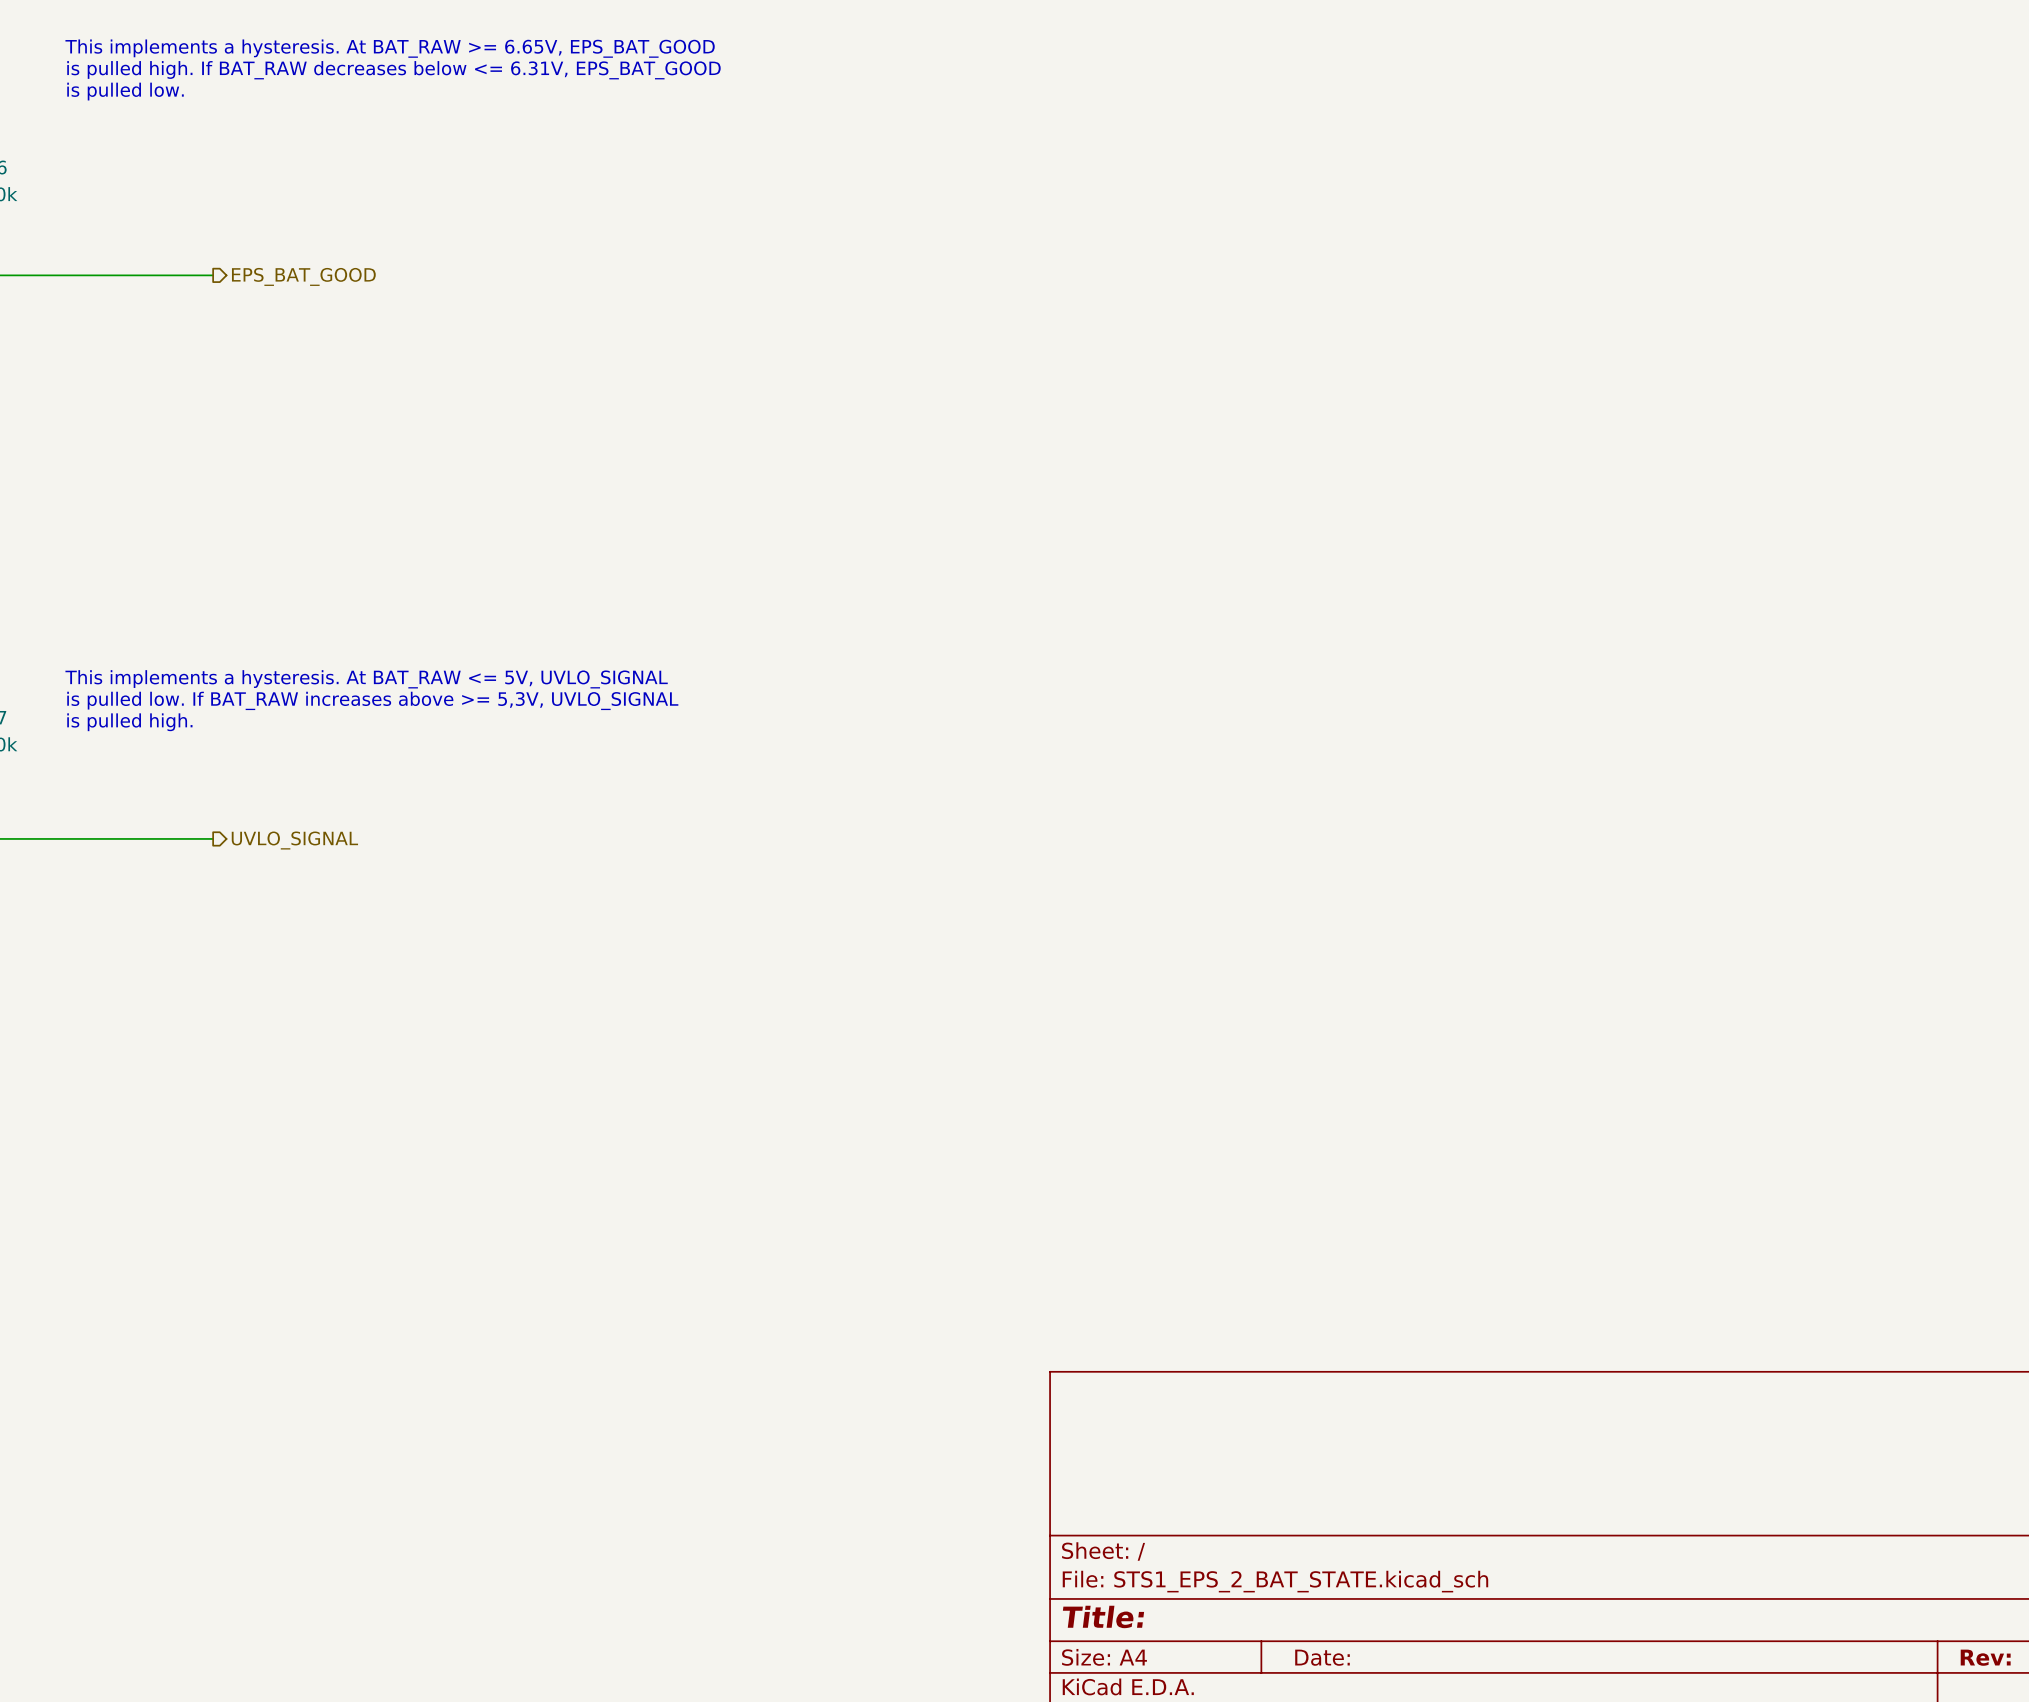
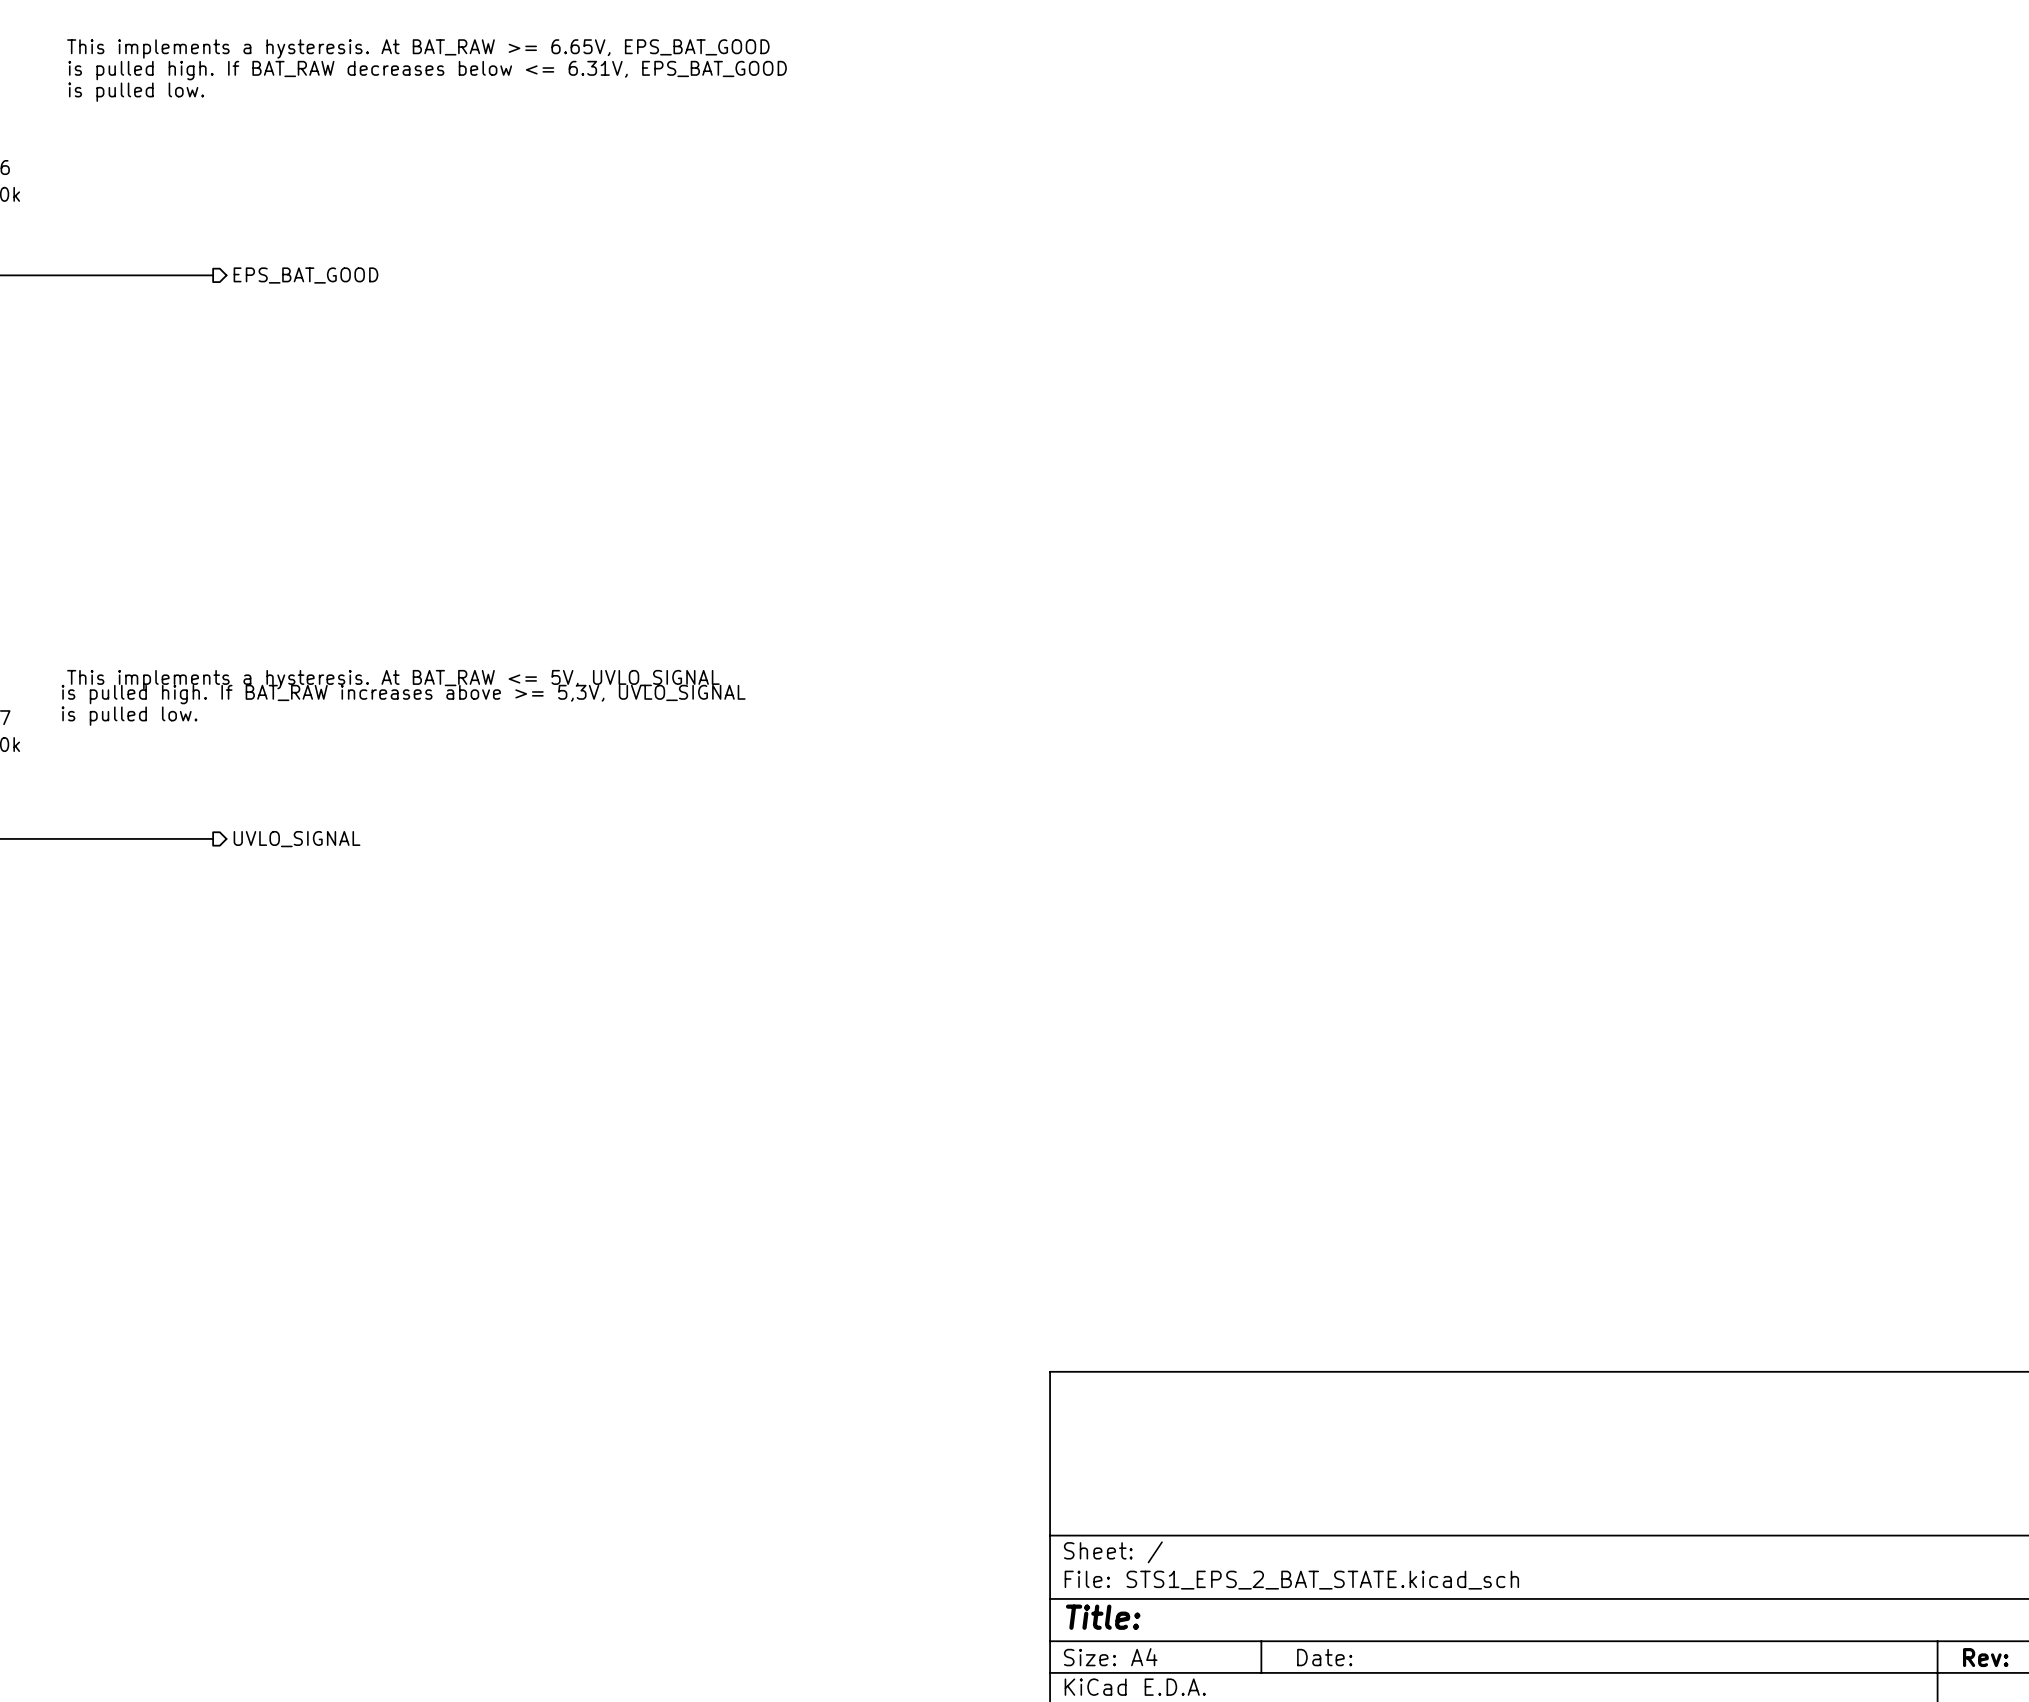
text: is pulled low. If BAT_RAW increases above >= 5,3V, UVLO_SIGNAL (372, 700) -> is pulled high. If BAT_RAW increases above >= 5,3V, UVLO_SIGNAL (403, 694)
text: is pulled high. (129, 722) -> is pulled low. (129, 716)

